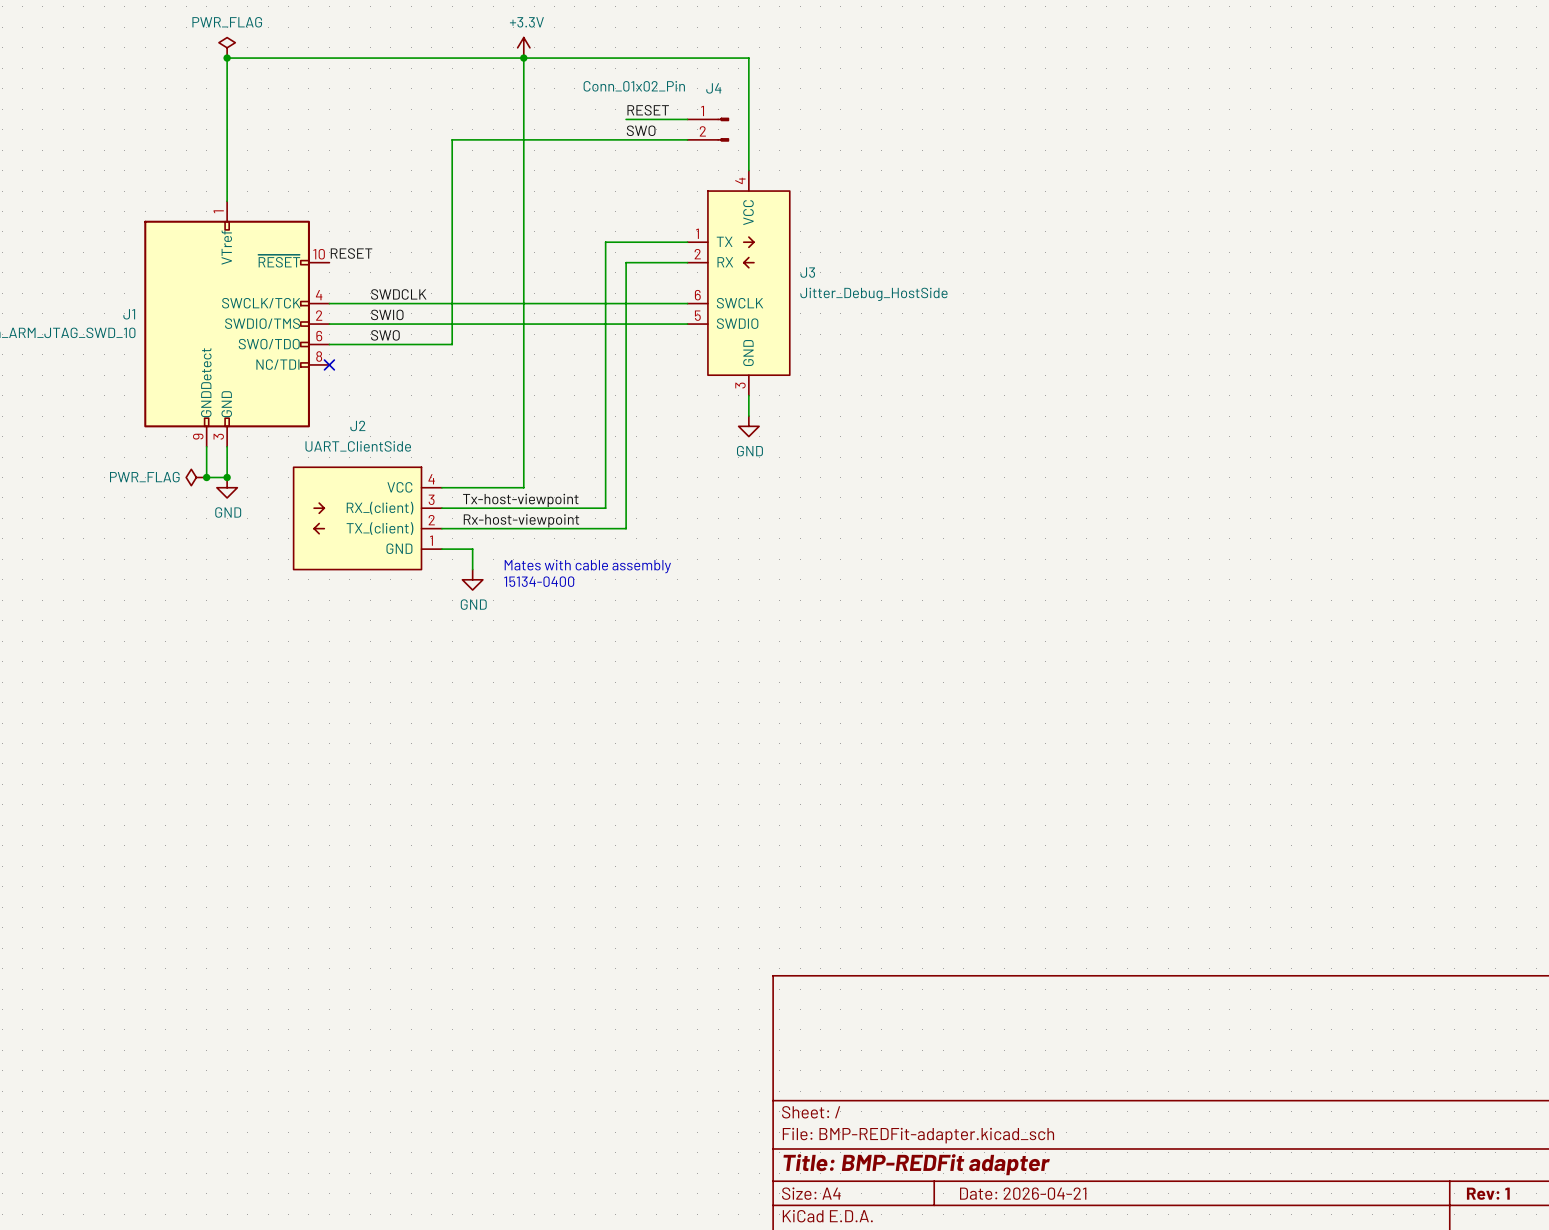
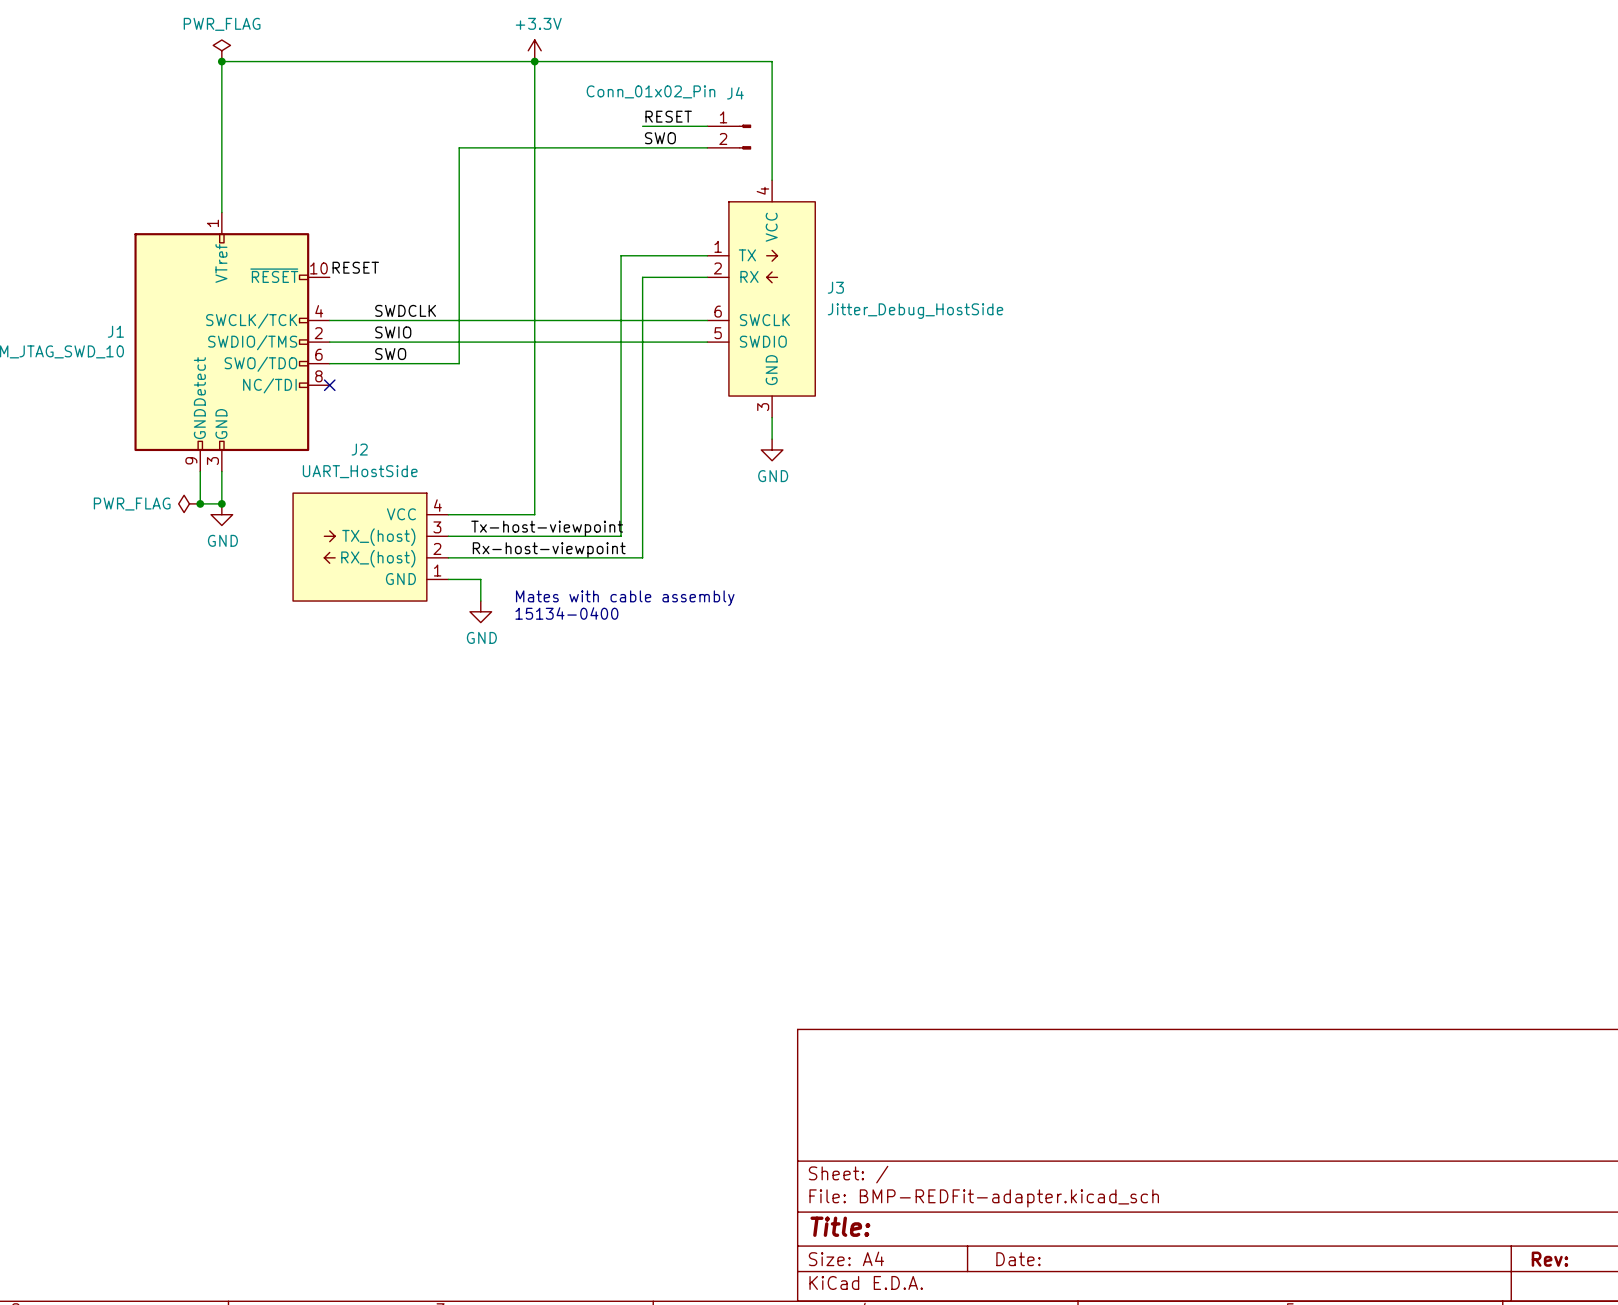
J2 value: UART_ClientSide (358, 446) -> UART_HostSide (360, 471)
J2 symbol: [293, 467, 442, 570] -> [293, 493, 449, 602]
title block: Title: BMP-REDFit adapter (916, 1164) -> Title: (840, 1226)
title block: Date: 2026-04-21 (1023, 1193) -> Date: (1018, 1259)
title block: Rev: 1 (1488, 1193) -> Rev: (1549, 1259)

